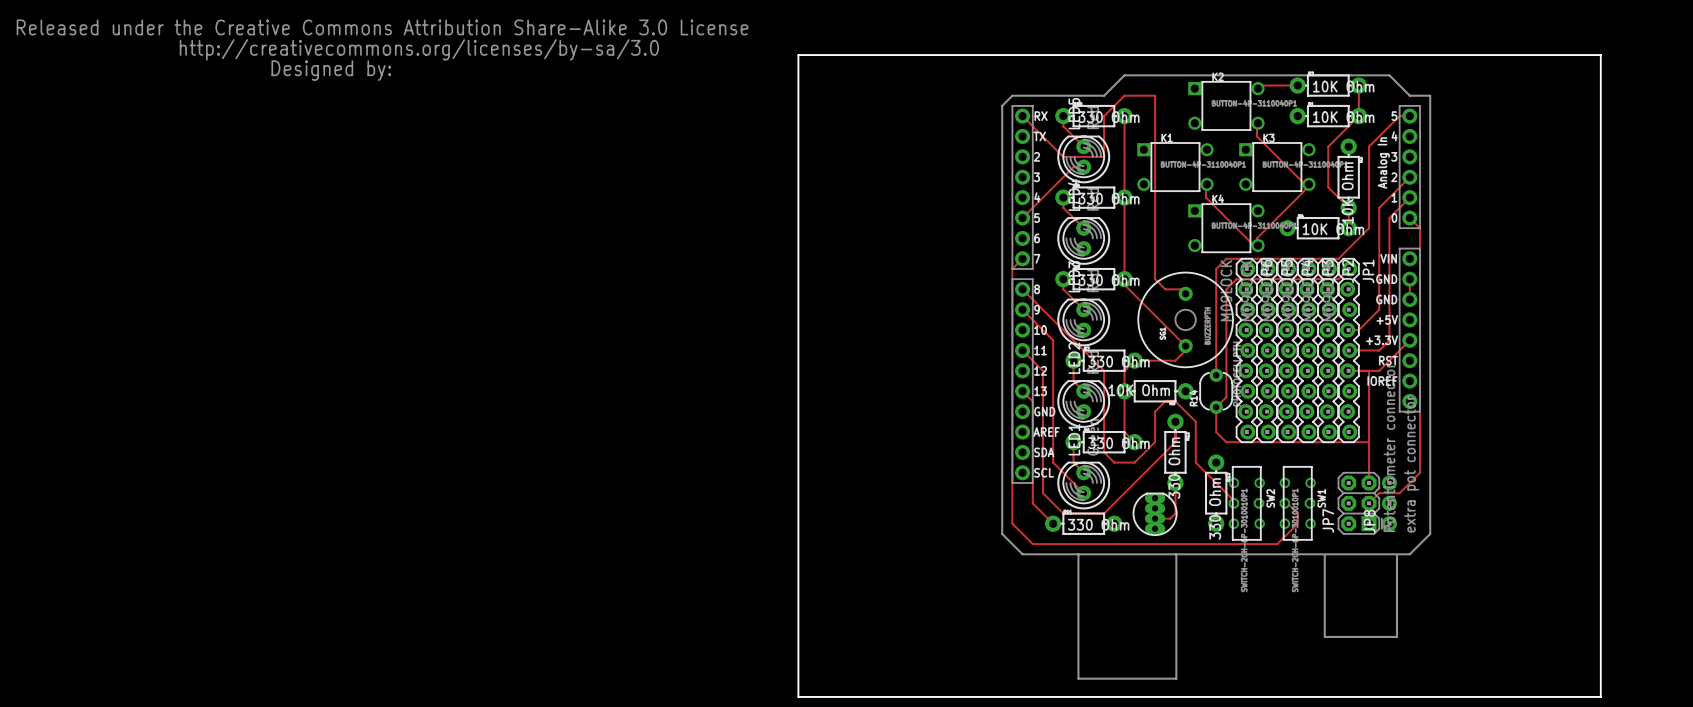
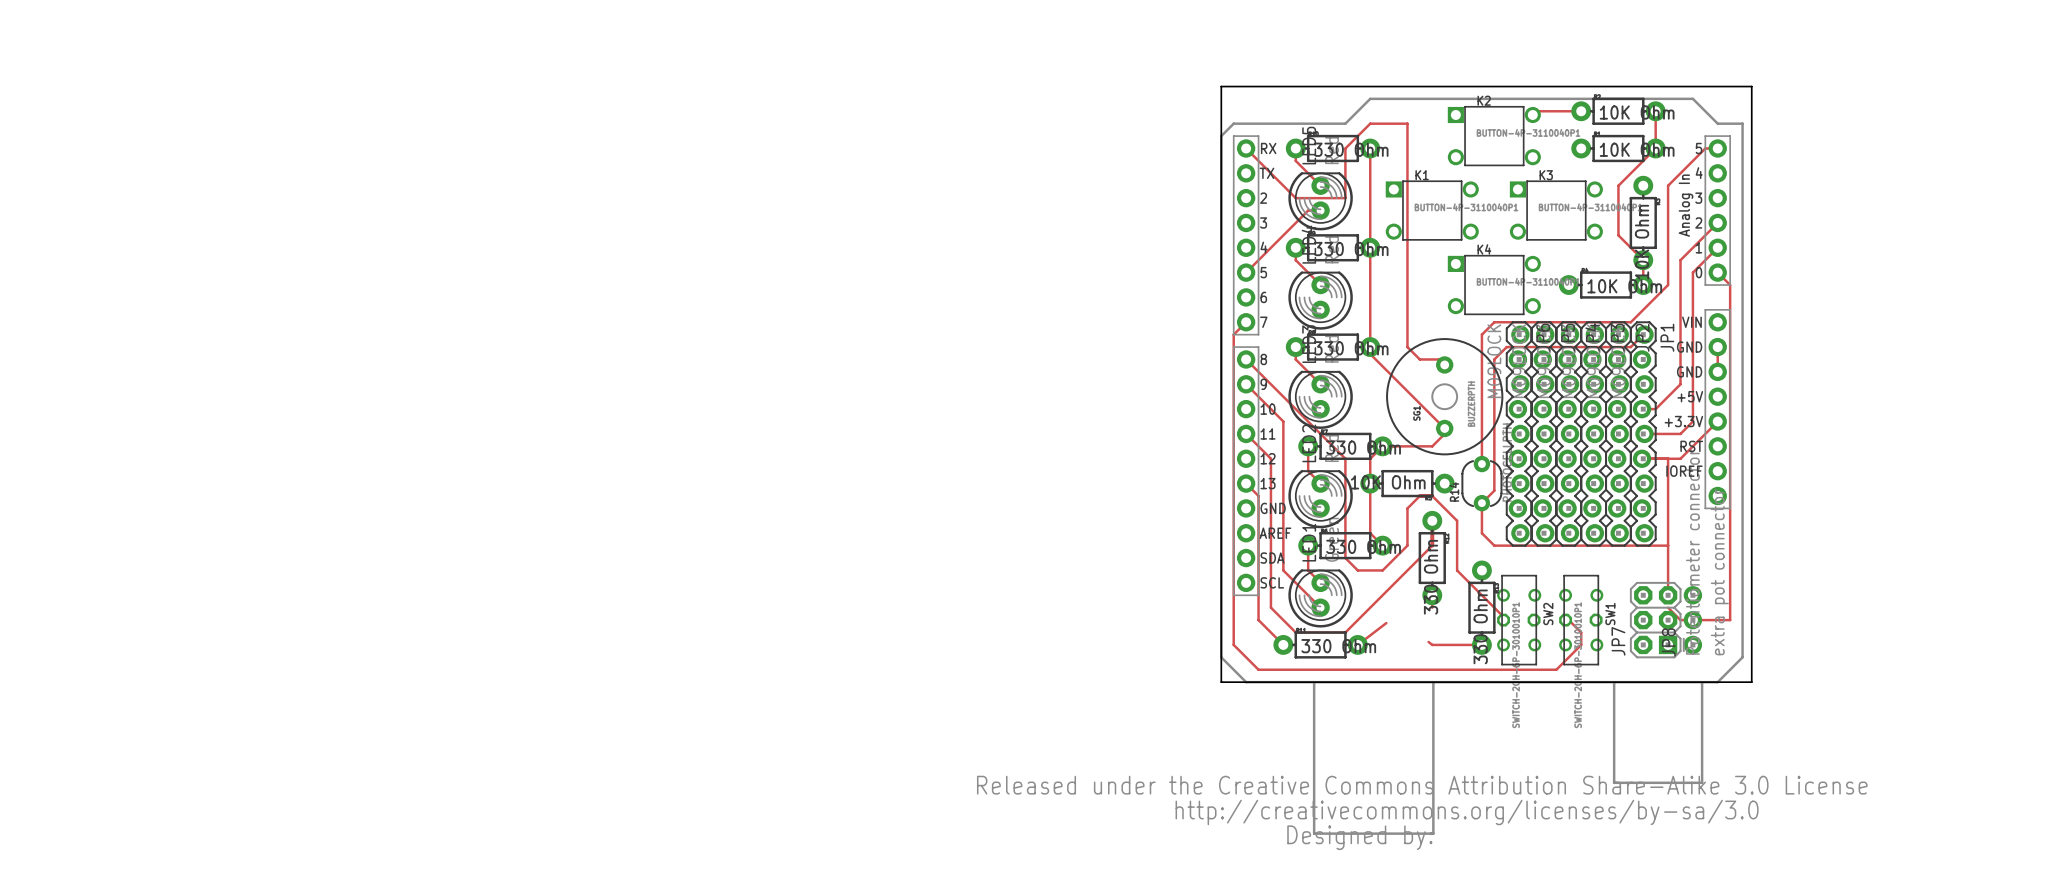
drawing: [16, 19, 749, 81] -> none
board edge: (798, 55) (1600, 55) (1600, 696) (798, 696) (798, 55) -> none
board edge: none -> (1221, 86) (1751, 86) (1751, 682) (1221, 682) (1221, 86)
track: (1257, 123) (1256, 136) (1307, 187) -> none
track: (1207, 184) (1206, 197) (1256, 248) -> none
track: (1307, 187) (1256, 238) (1256, 248) -> none
track: (1420, 472) (1399, 493) (1379, 493) (1369, 503) -> (1730, 582) (1730, 620) (1680, 620) (1668, 607)
track: (1175, 482) (1175, 513) (1170, 518) (1155, 518) -> none
track: none -> (1386, 623) (1357, 644)
part: (1155, 514) -> none
track: none -> (1428, 641) (1432, 644) (1481, 644)
drawing: none -> [977, 775, 1868, 850]

